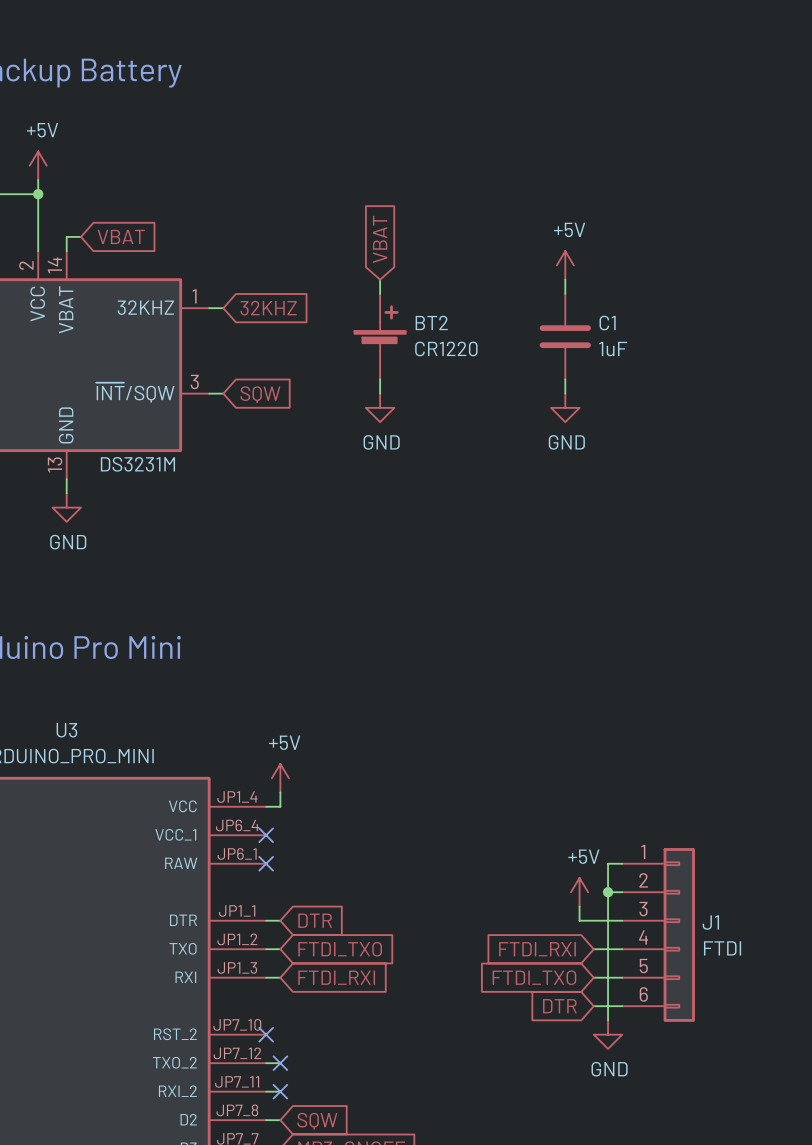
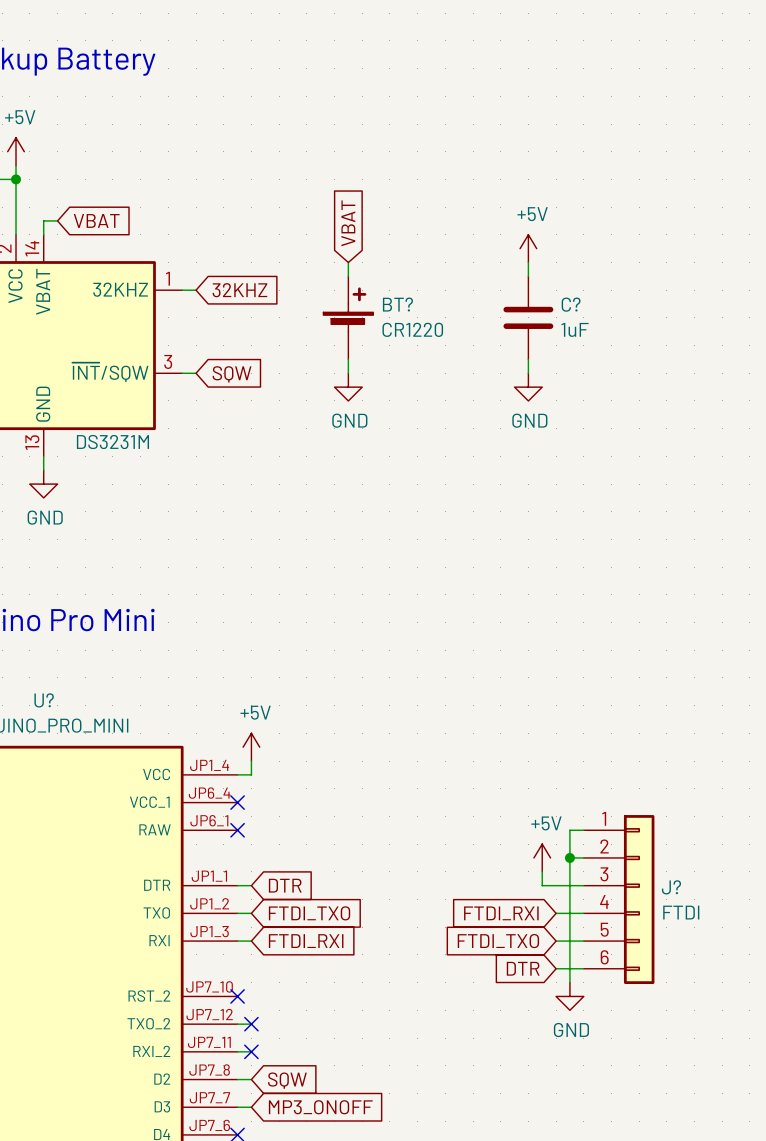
BT2 name: BT2 (431, 322) -> BT? (397, 304)
C1 name: C1 (607, 323) -> C? (571, 304)
U3 name: U3 (66, 730) -> U? (44, 700)
J1 name: J1 (710, 922) -> J? (671, 887)

